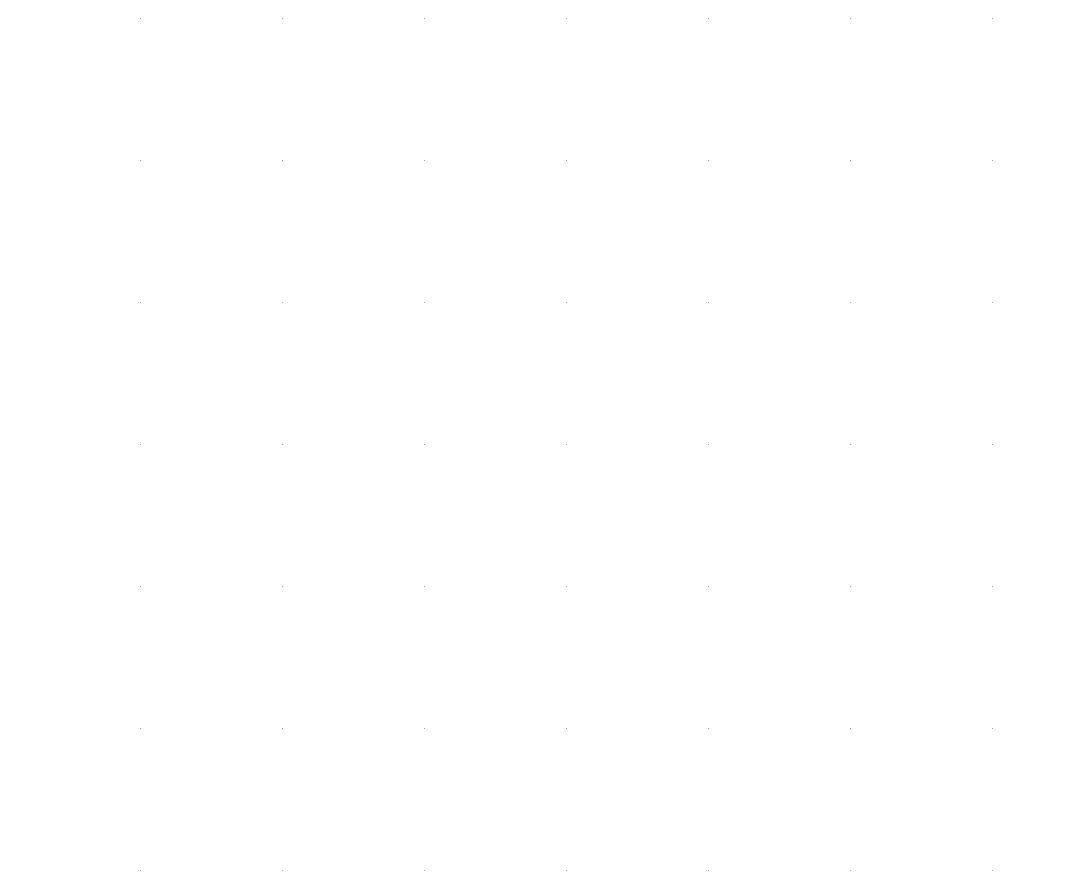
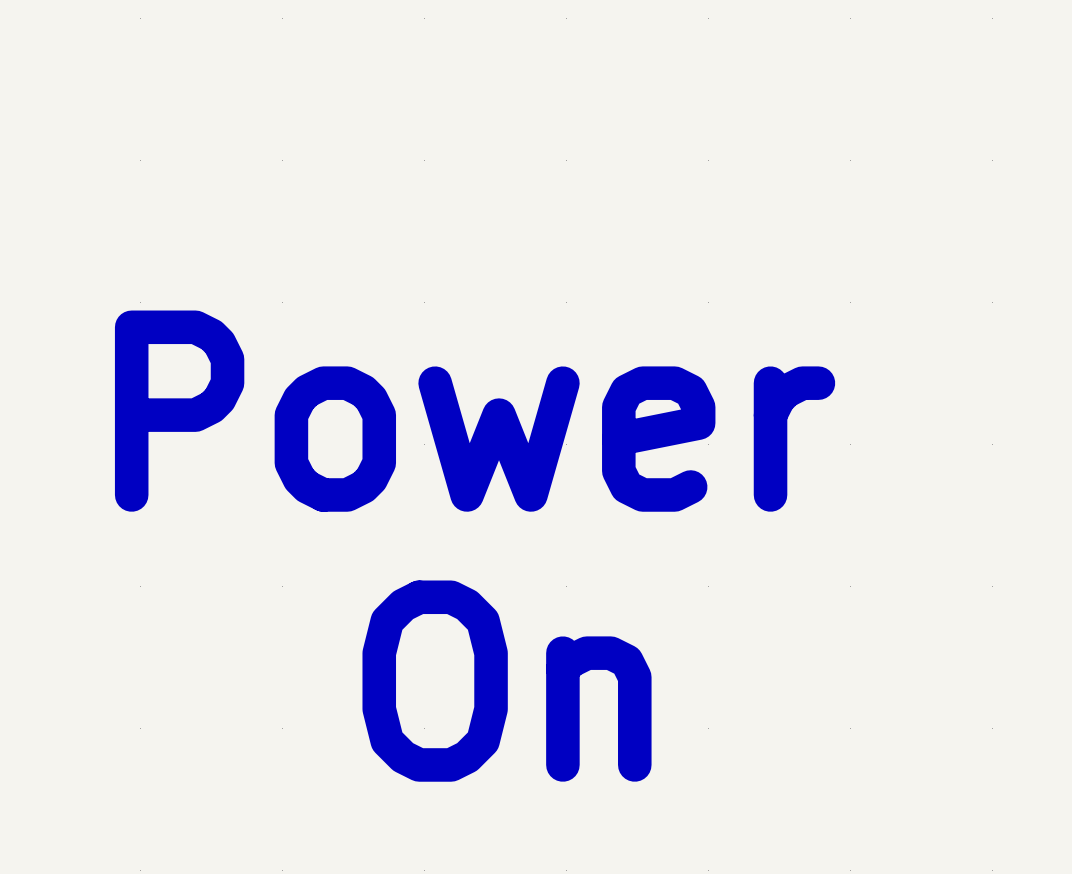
text: none -> Power (475, 411)
text: none -> On (507, 681)

